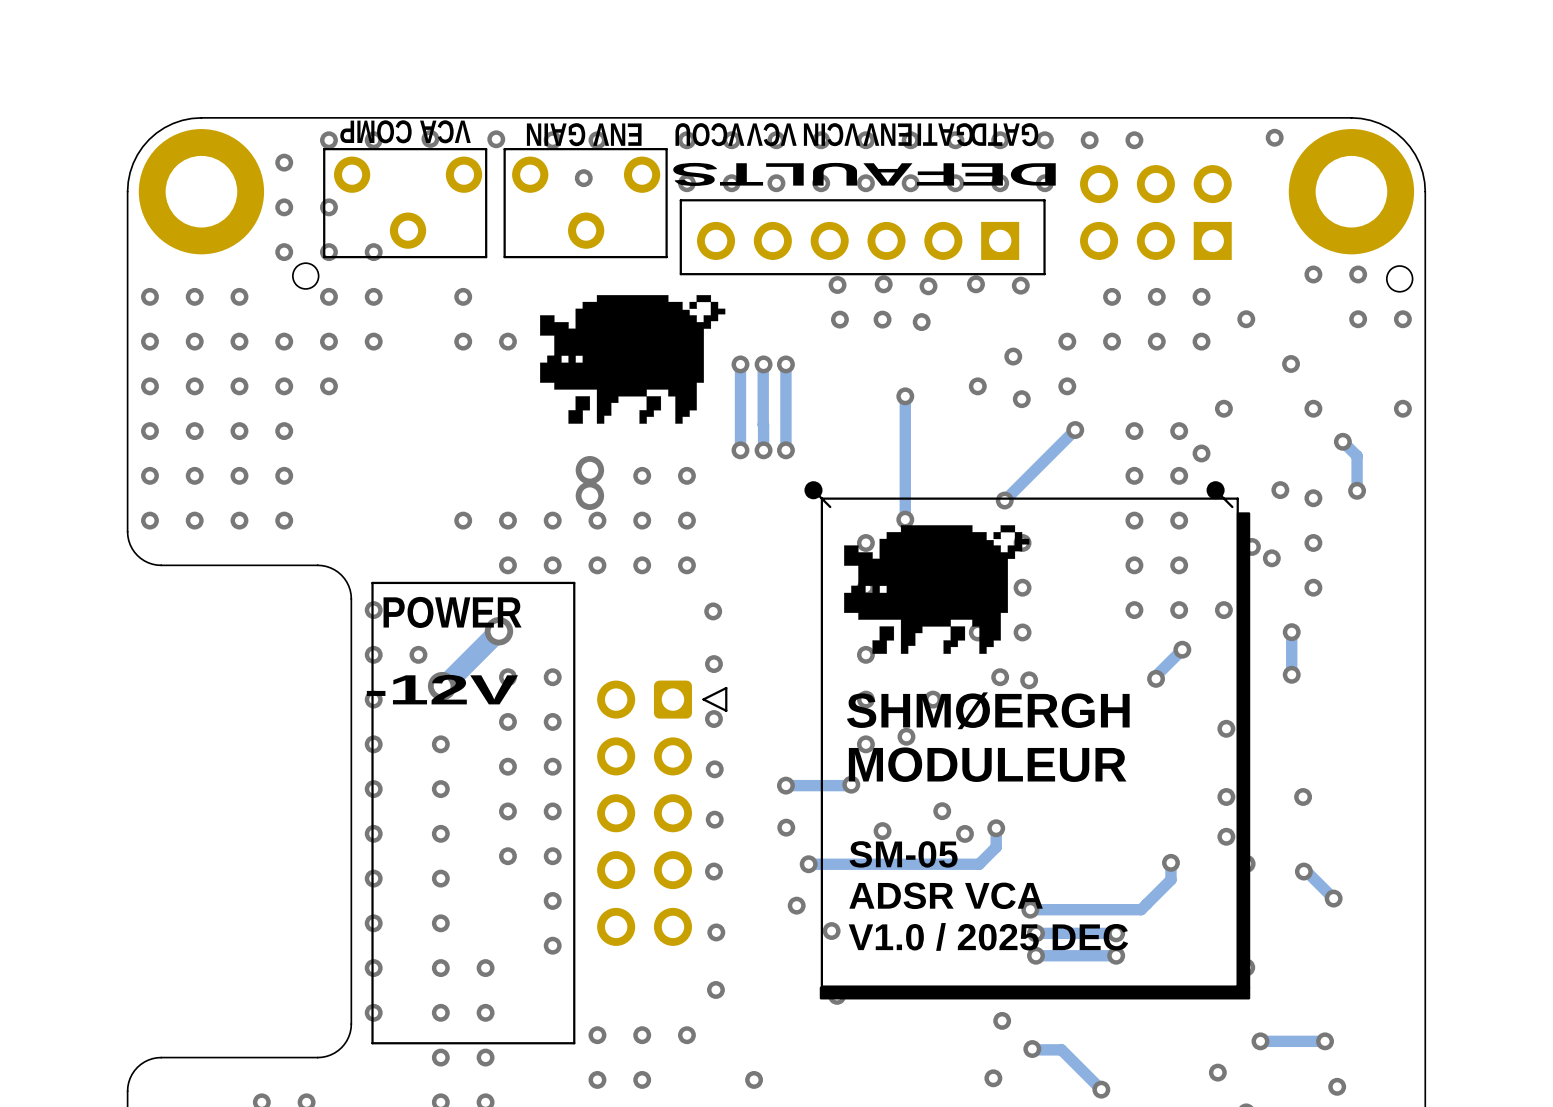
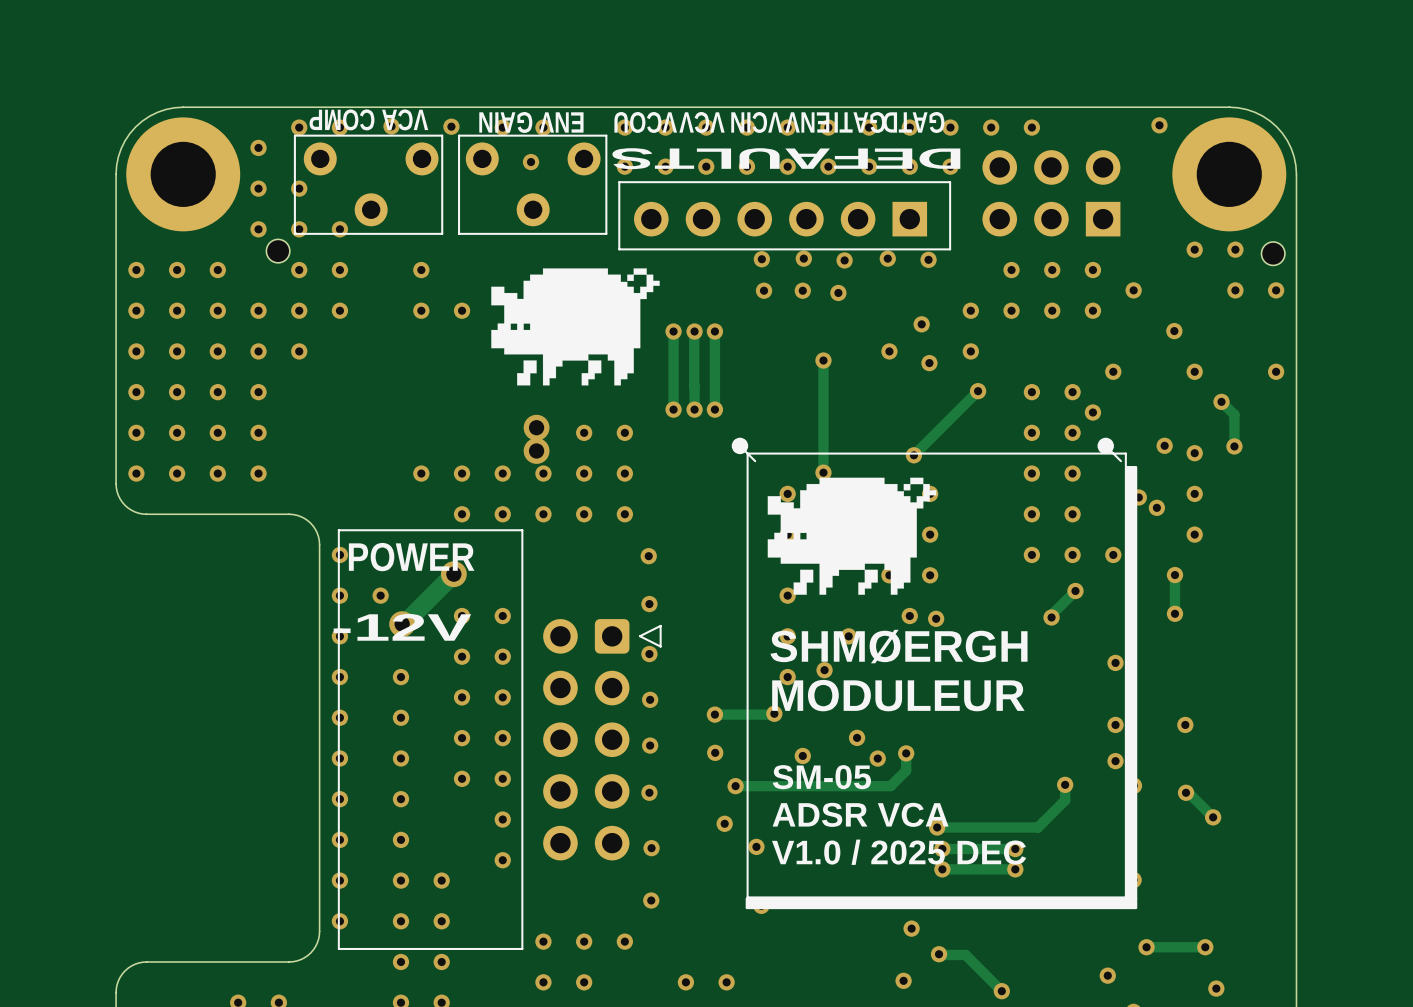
via: none -> (726, 982)

